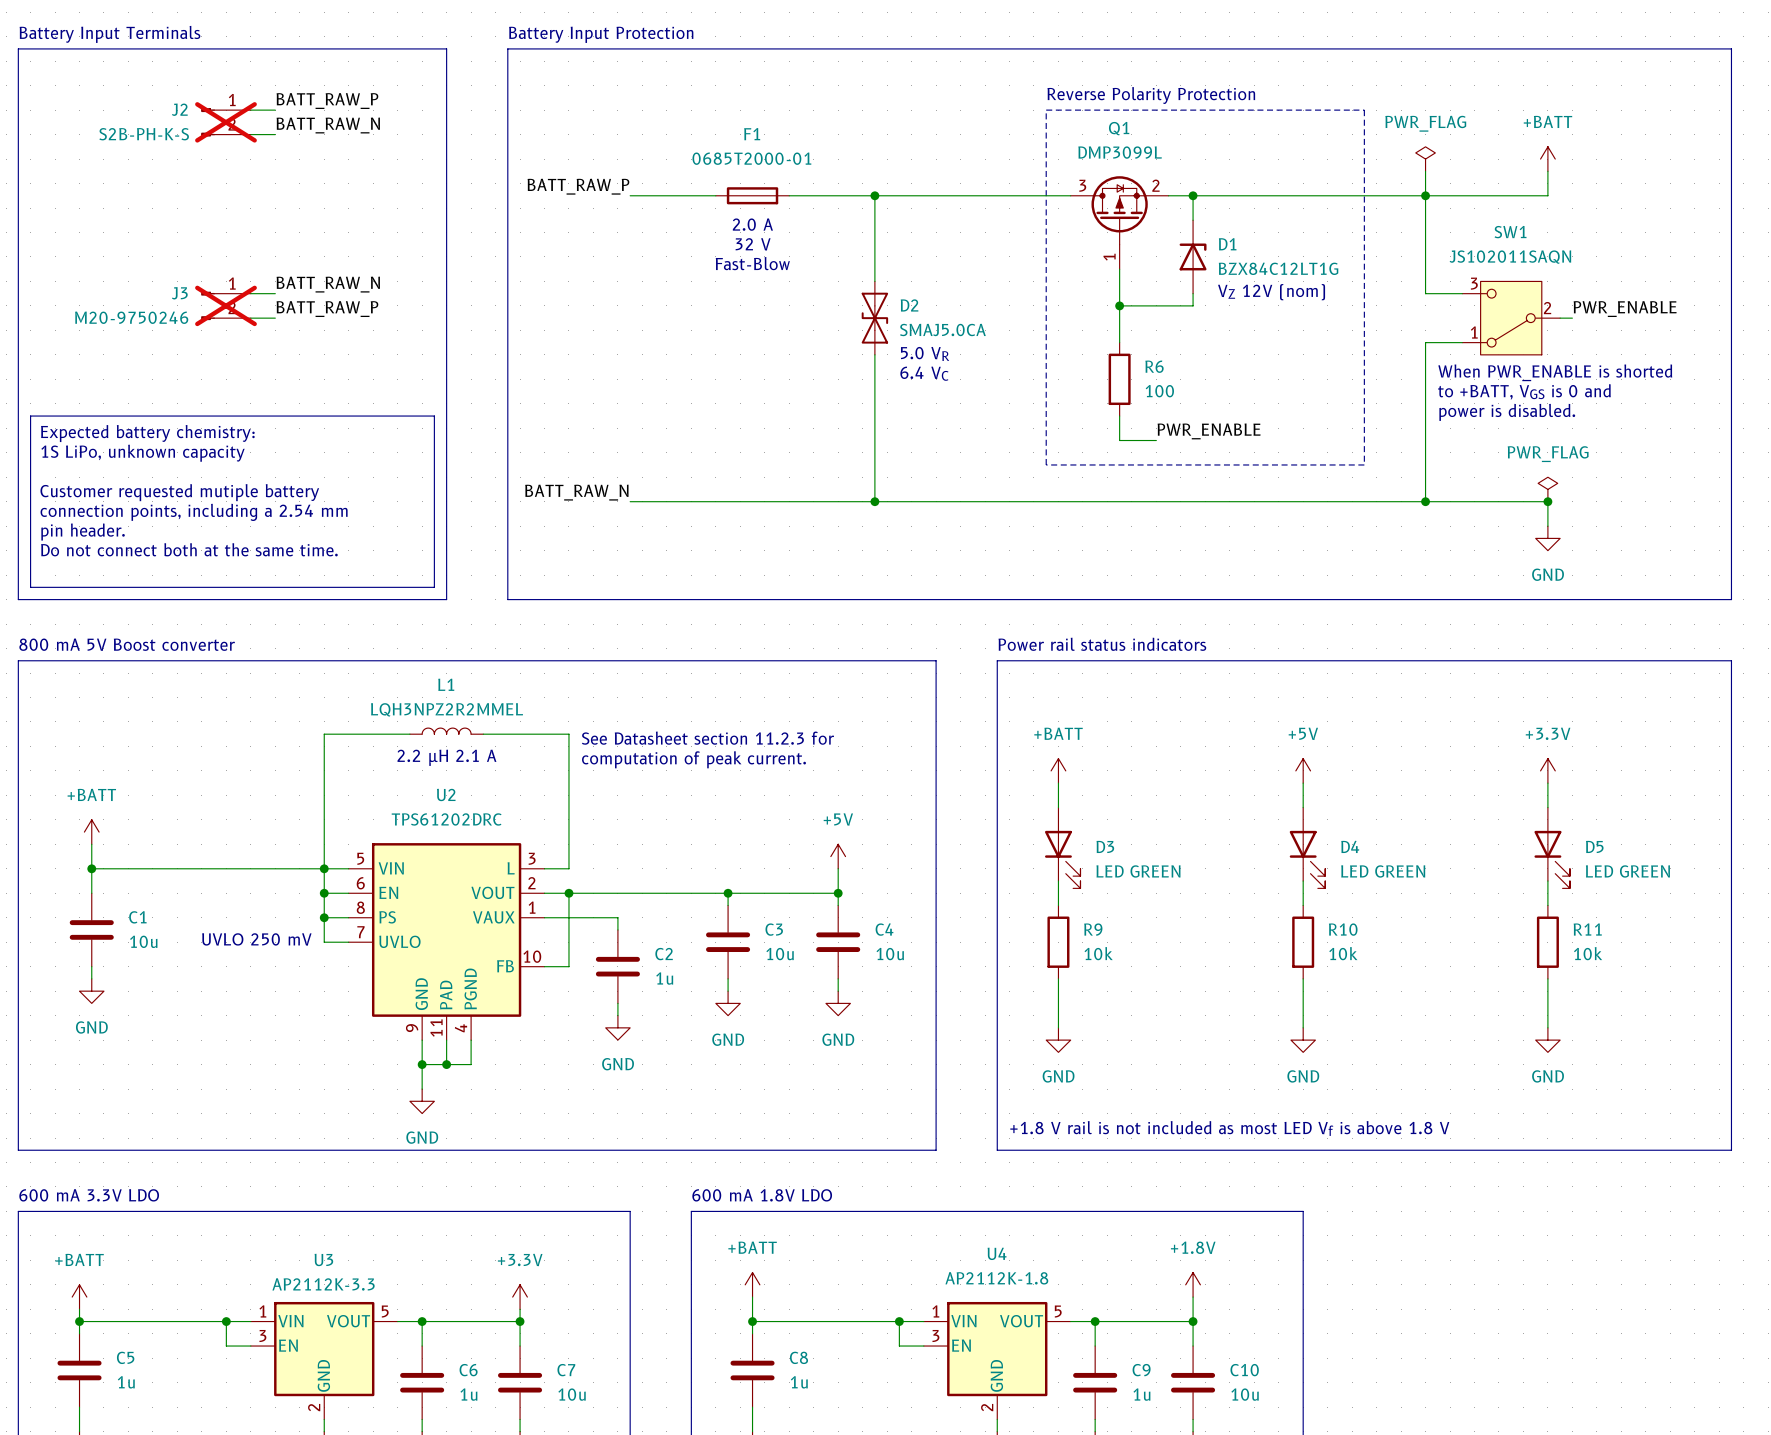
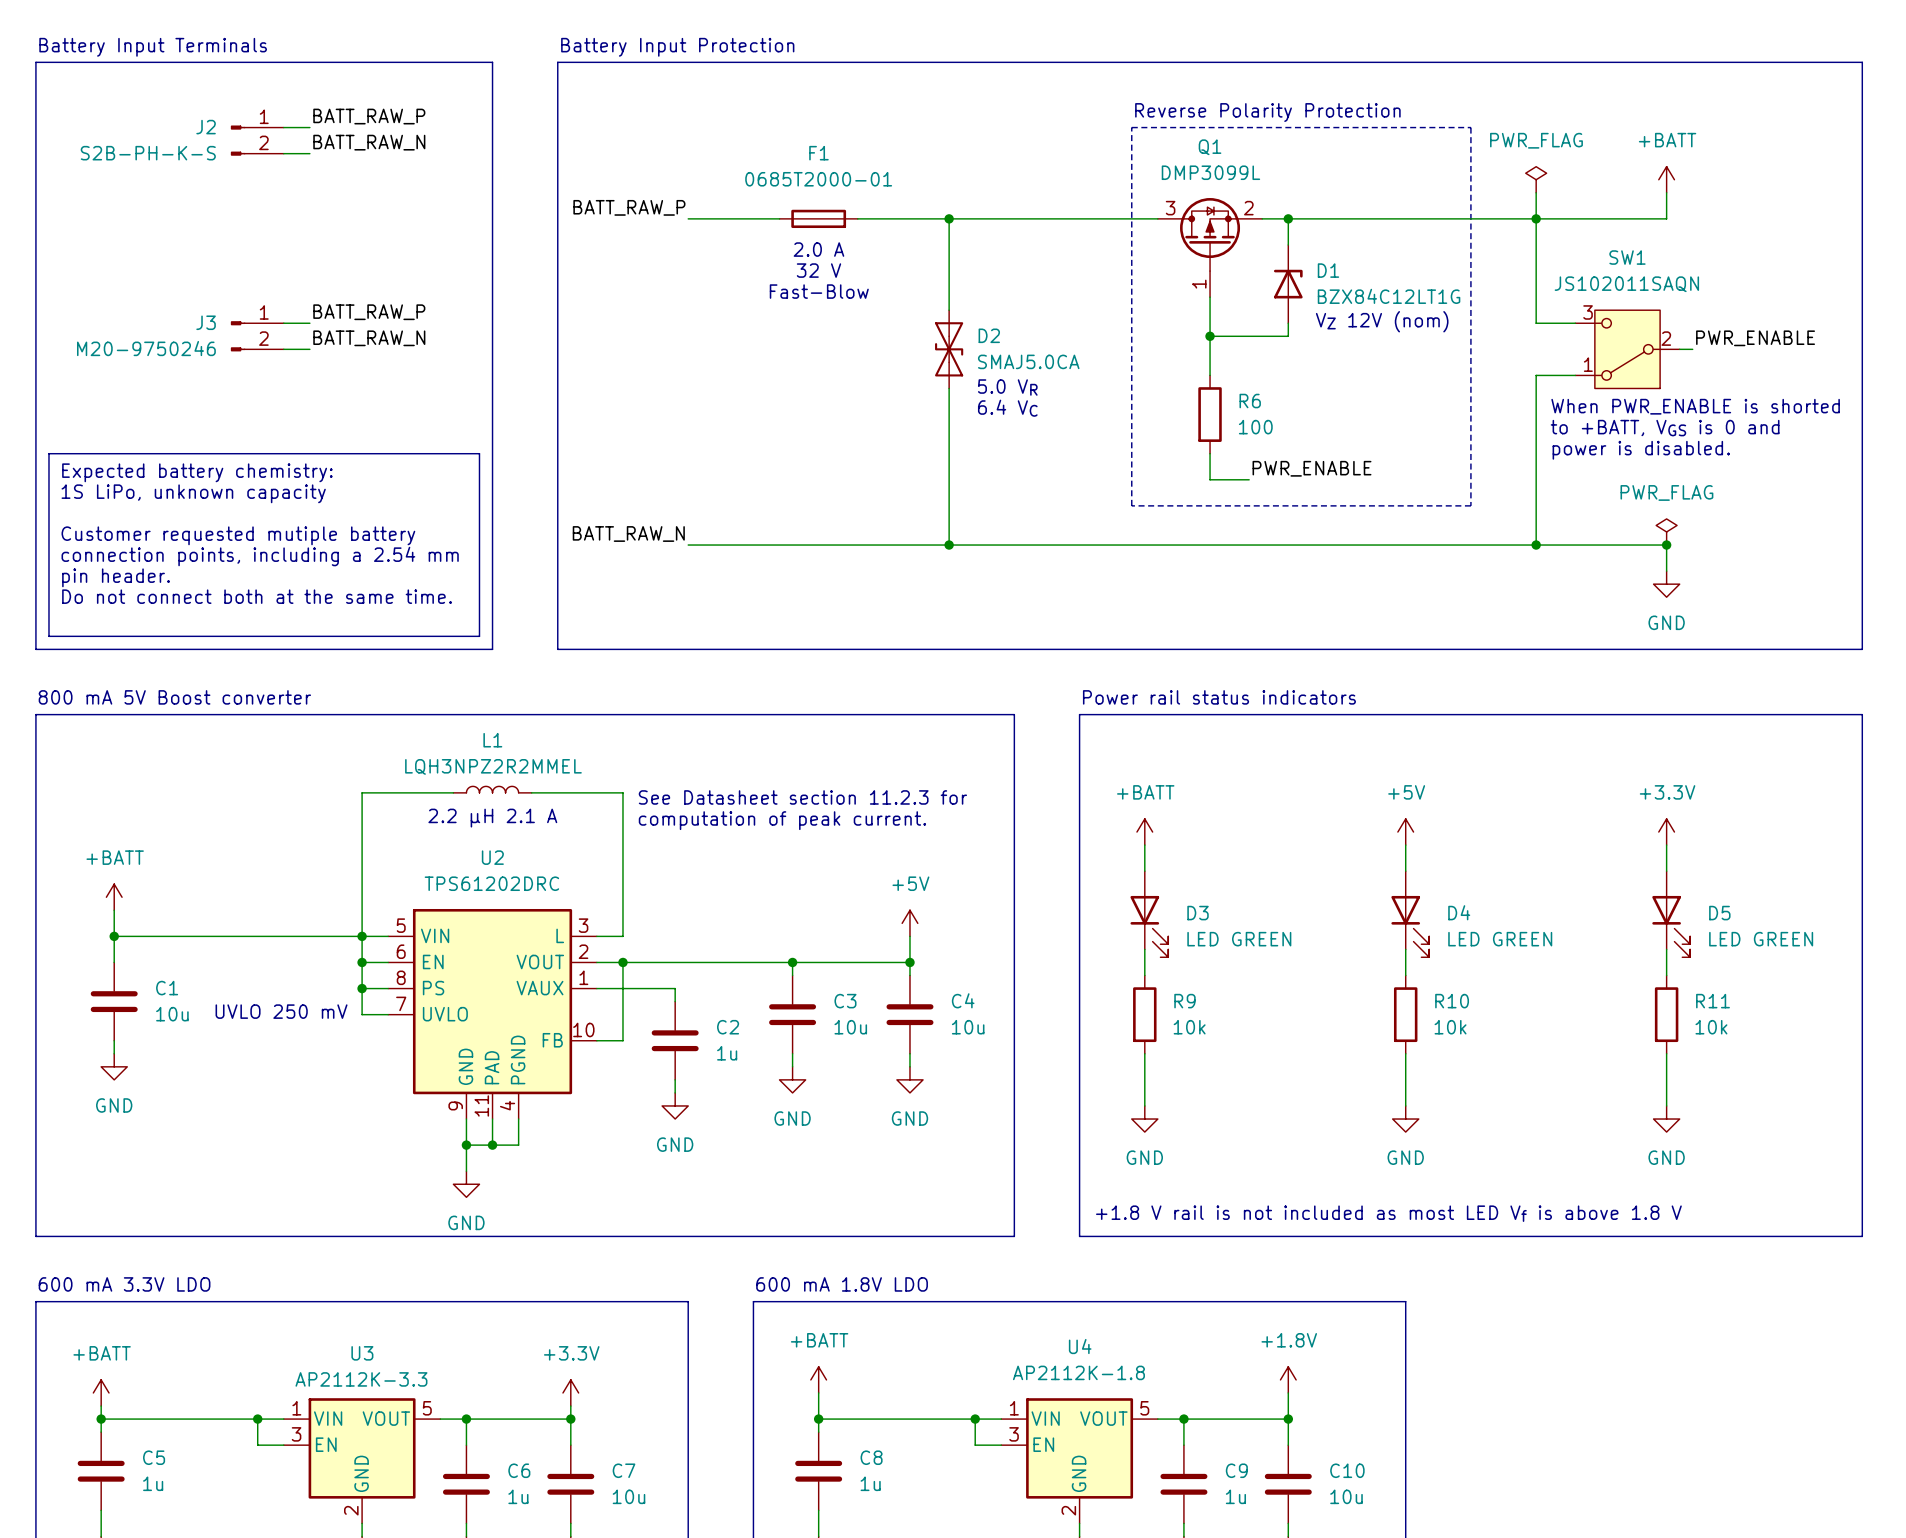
J2 do-not-place cross: (225, 122) -> none
label: BATT_RAW_N (328, 284) -> BATT_RAW_P (369, 312)
J3 do-not-place cross: (225, 305) -> none
label: BATT_RAW_P (327, 309) -> BATT_RAW_N (369, 338)

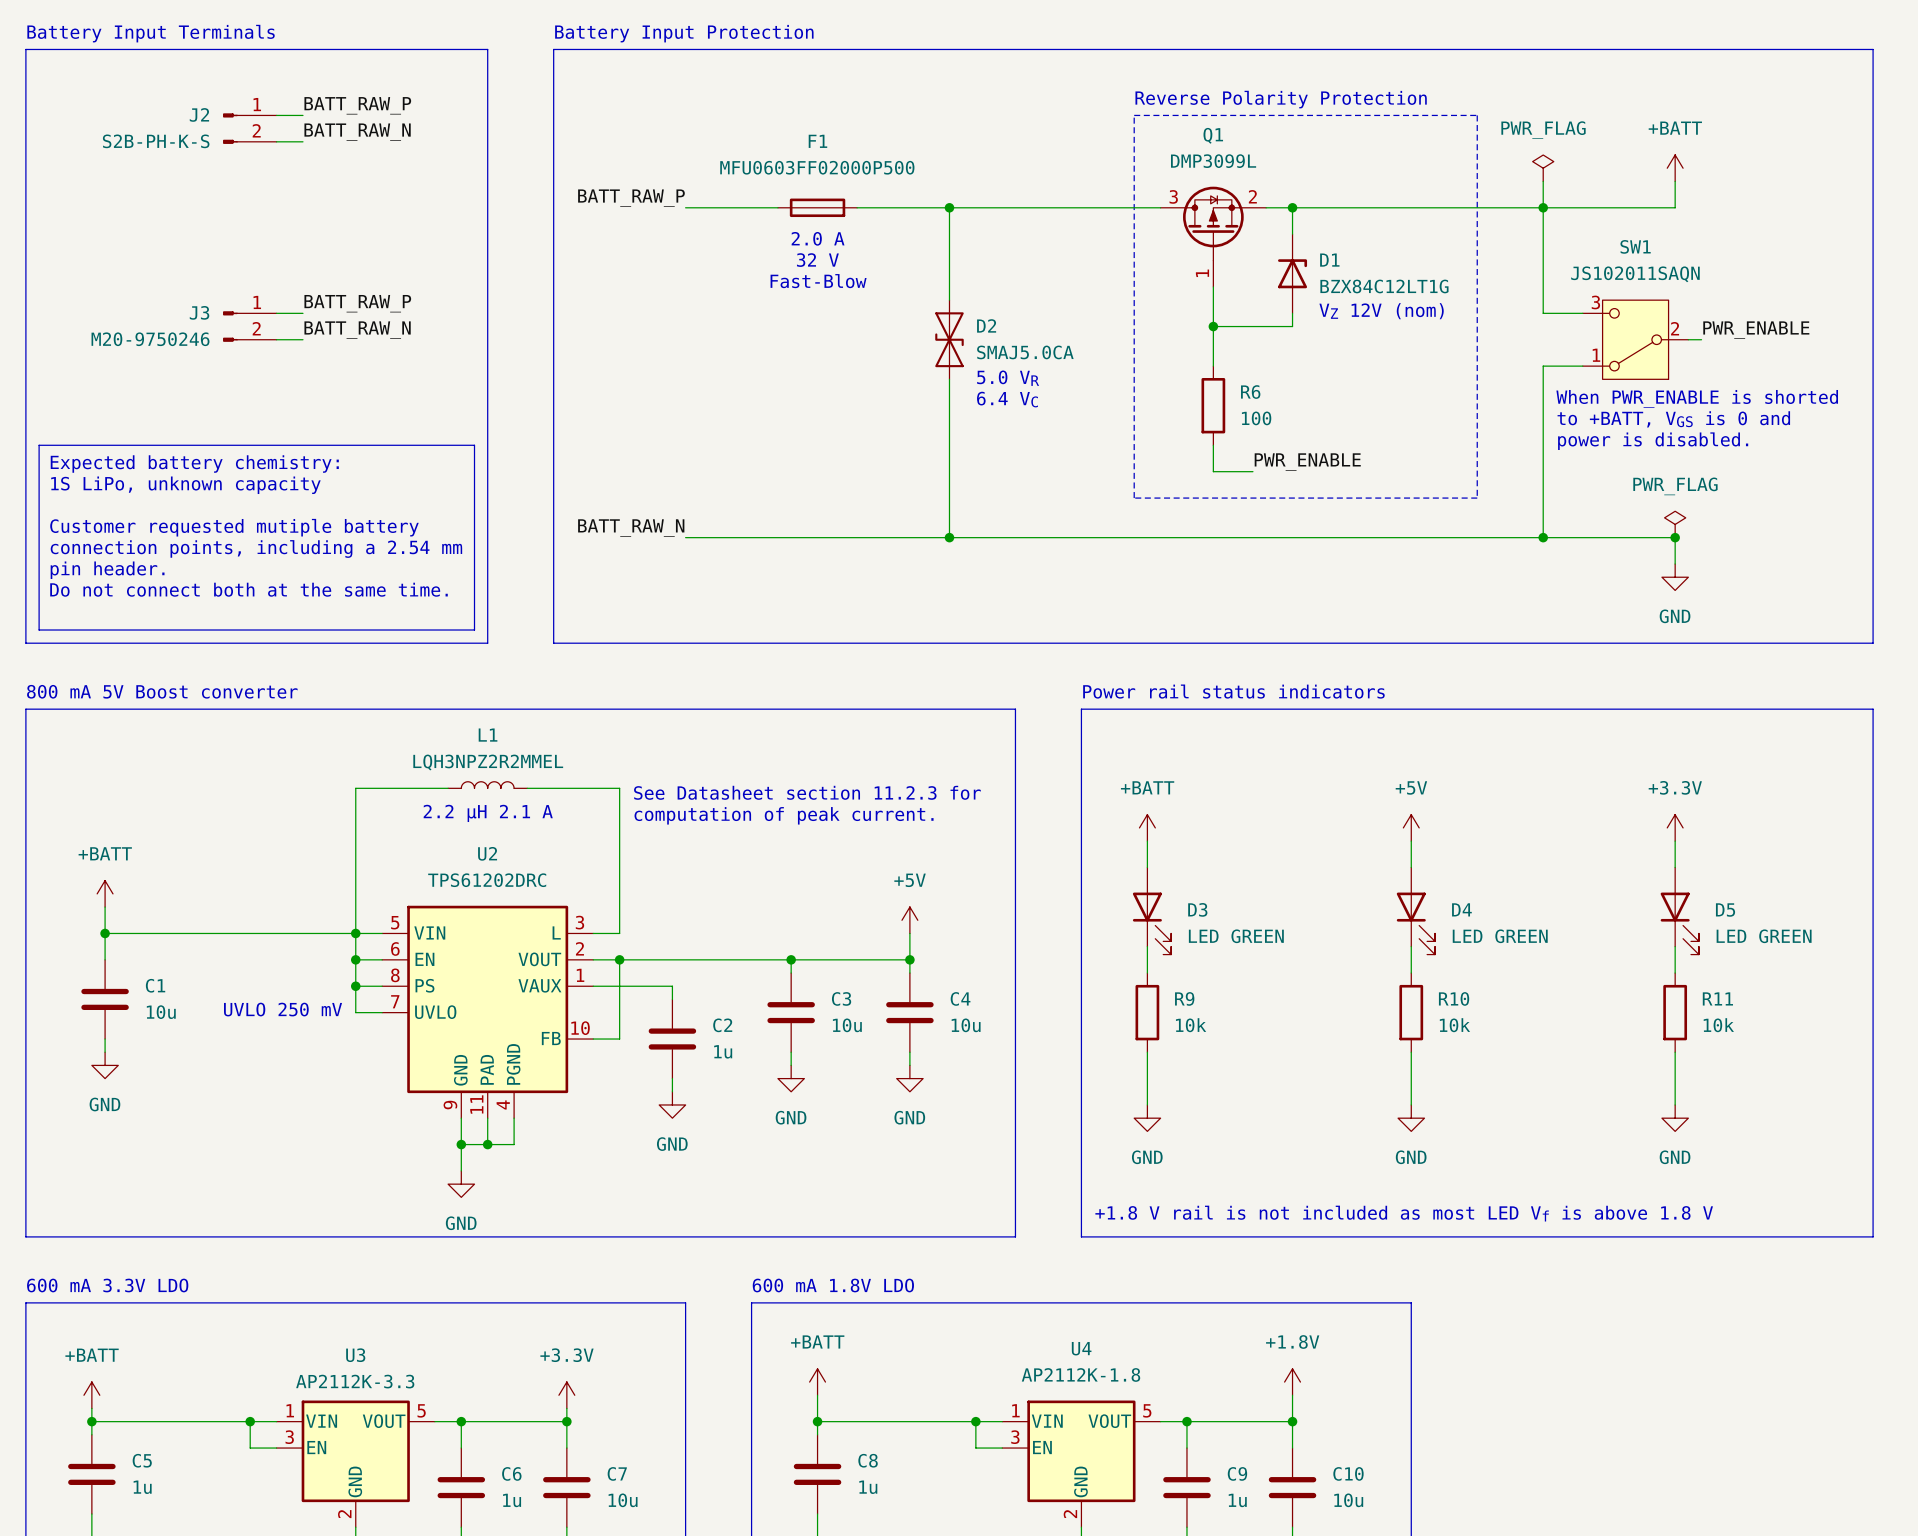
F1 value: 0685T2000-01 (818, 179) -> MFU0603FF02000P500 (817, 167)

